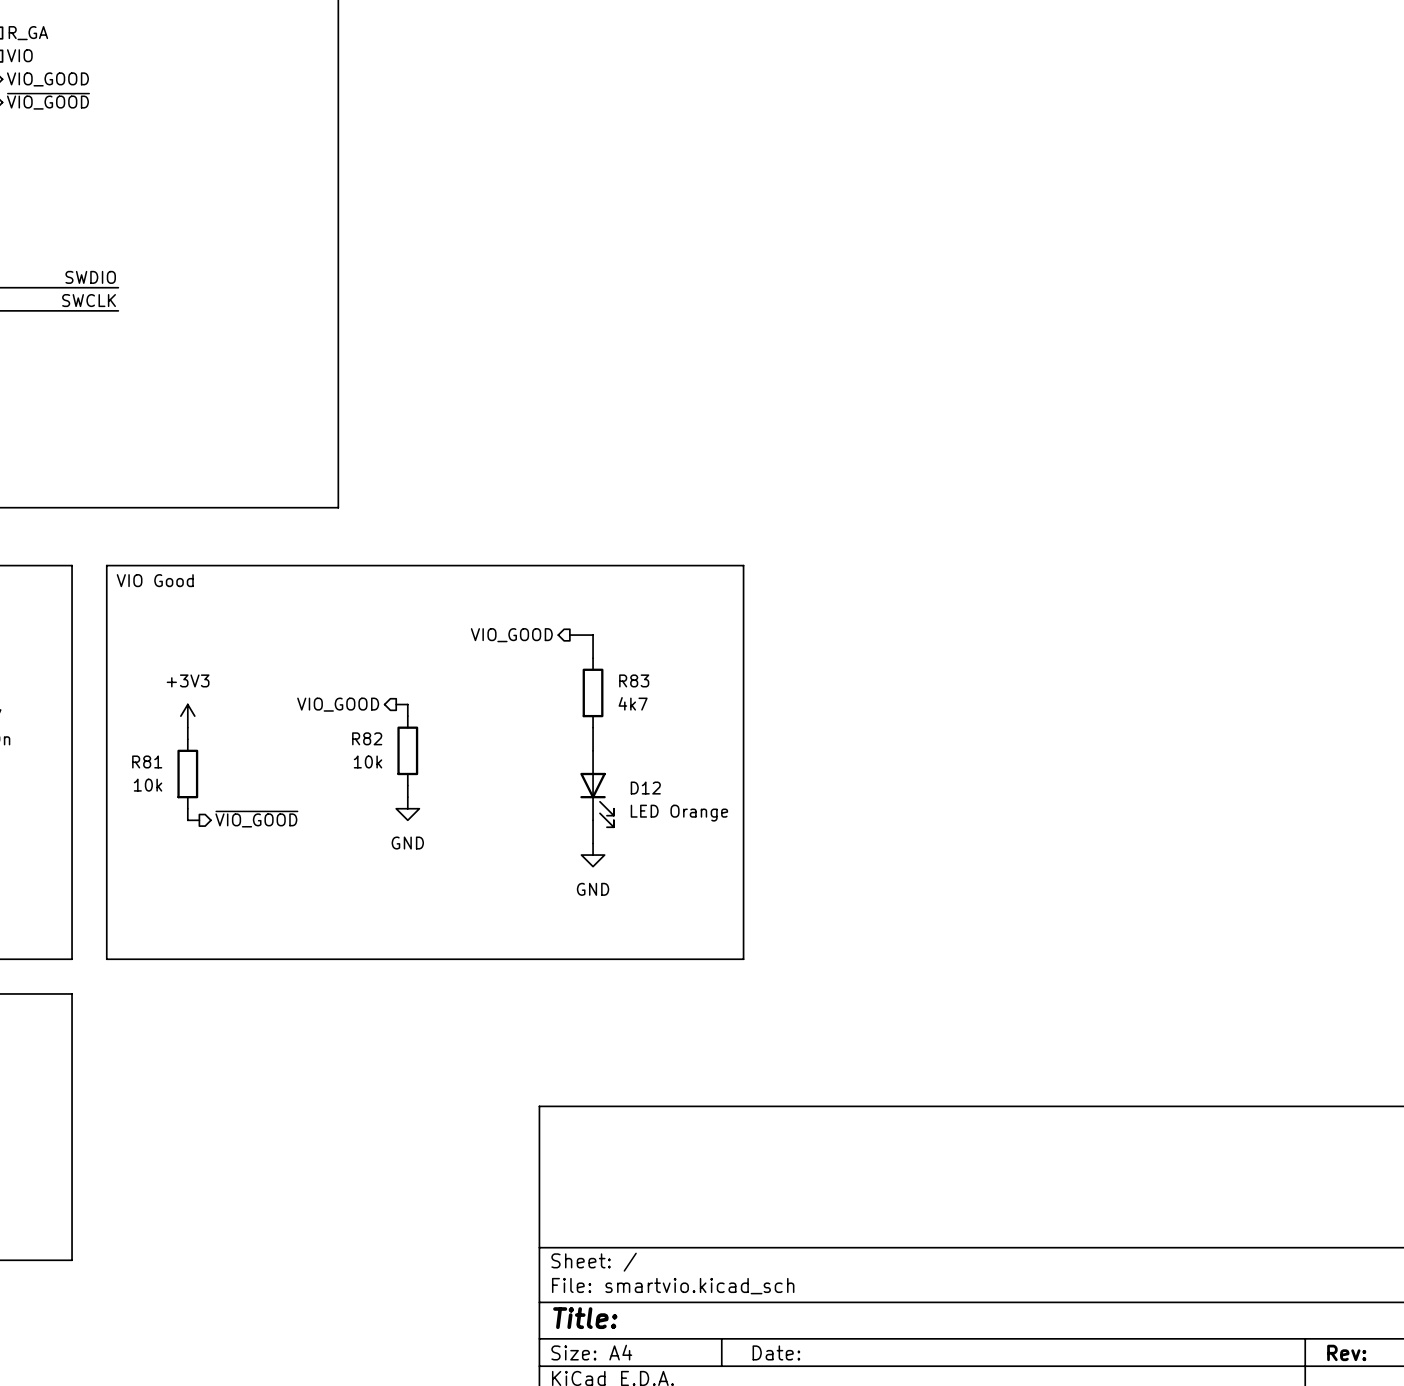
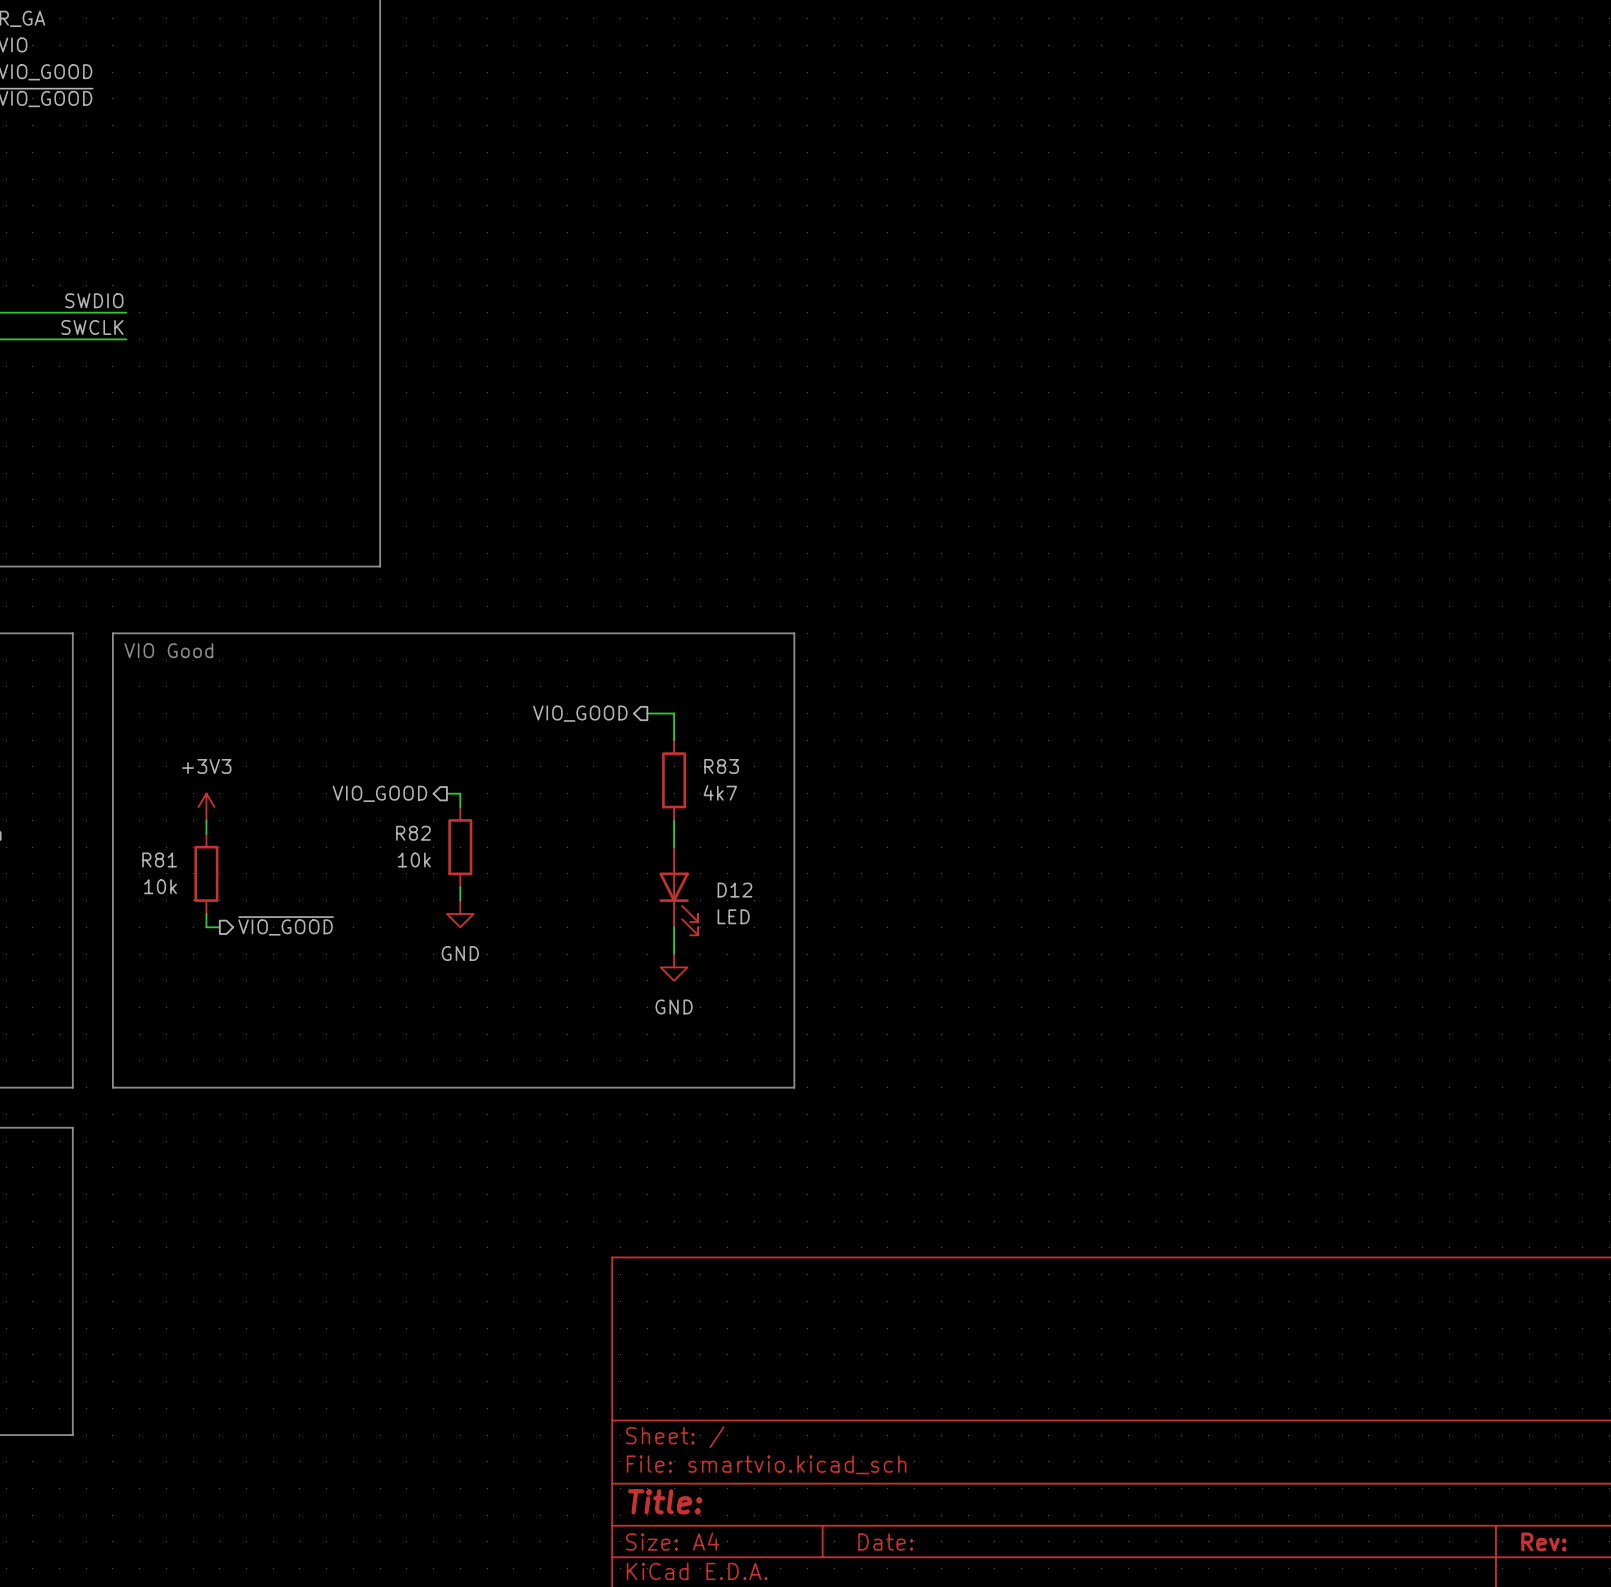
line: (697, 565) (743, 565) (743, 959) (697, 959) -> (794, 633) (794, 1087)
D12 value: LED Orange (679, 813) -> LED (733, 916)

